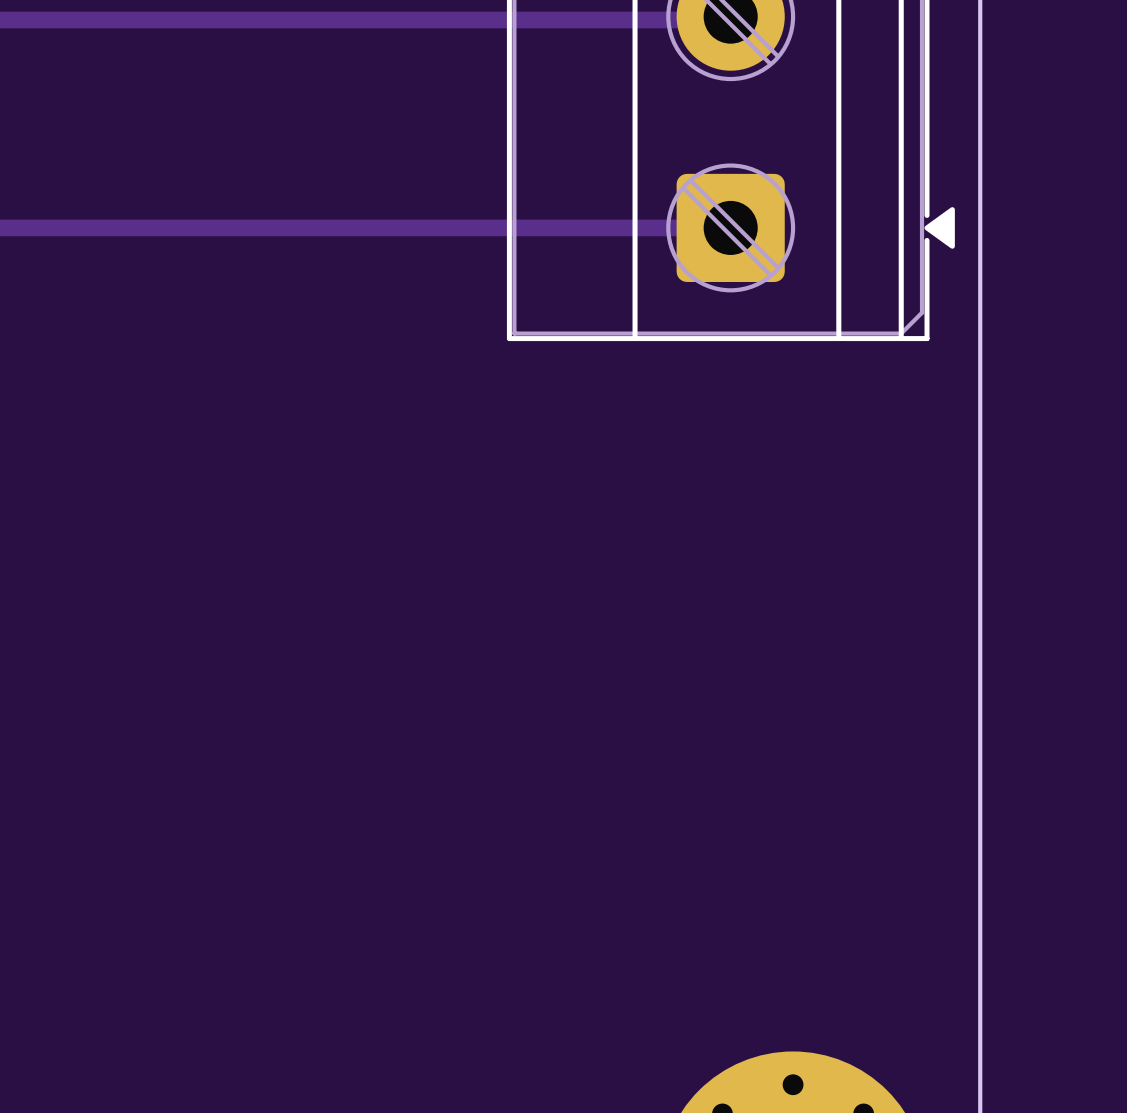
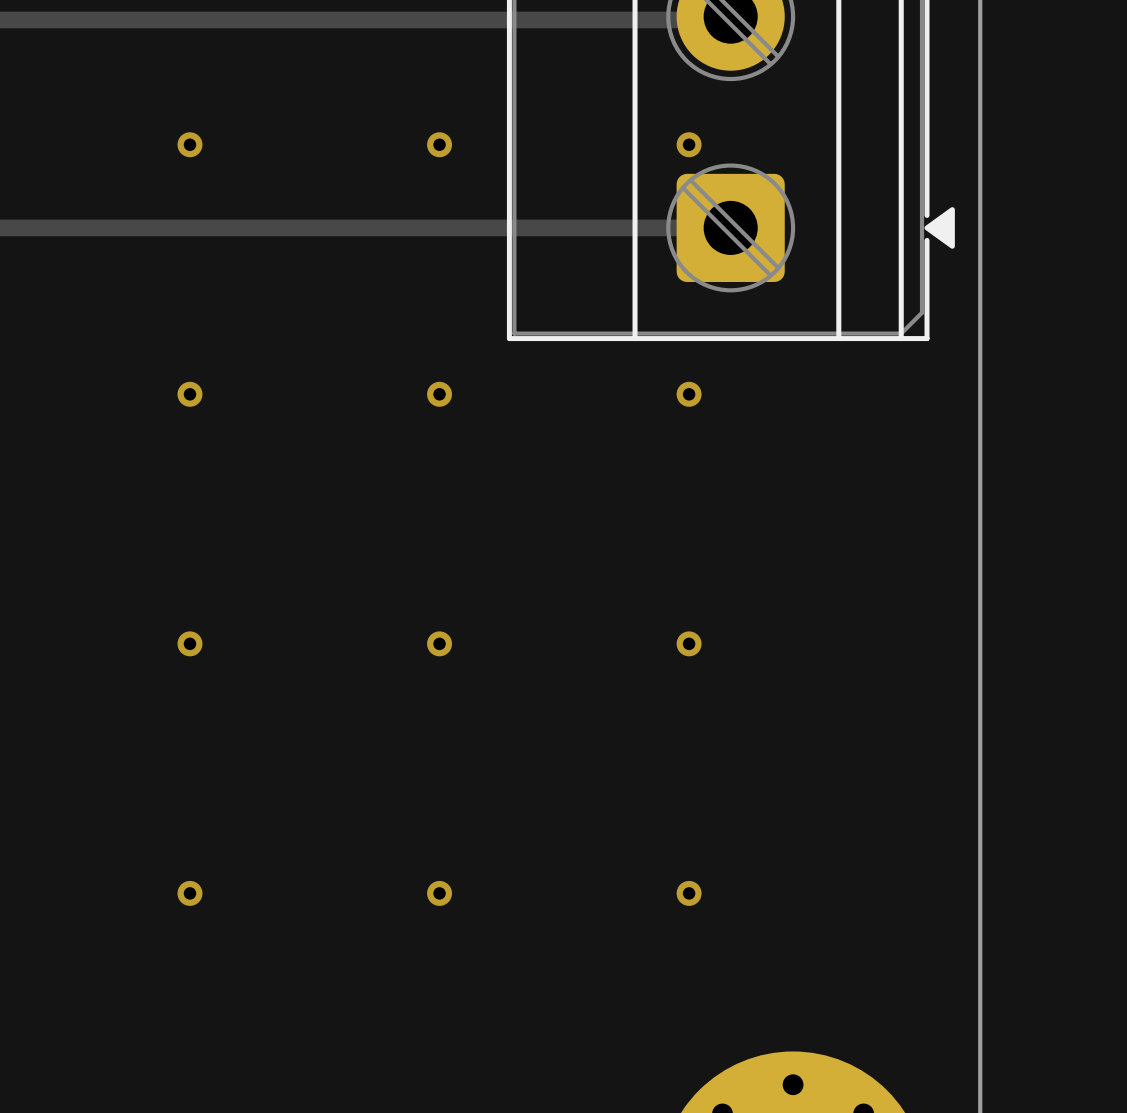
via: none -> (189, 144)
via: none -> (439, 144)
via: none -> (689, 144)
via: none -> (189, 394)
via: none -> (439, 394)
via: none -> (689, 394)
via: none -> (189, 643)
via: none -> (439, 643)
via: none -> (689, 643)
via: none -> (189, 893)
via: none -> (439, 893)
via: none -> (689, 893)

